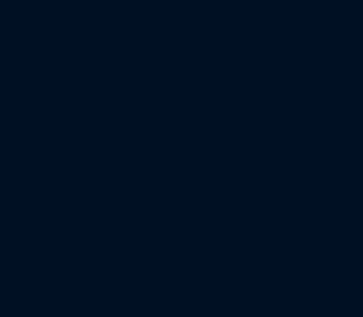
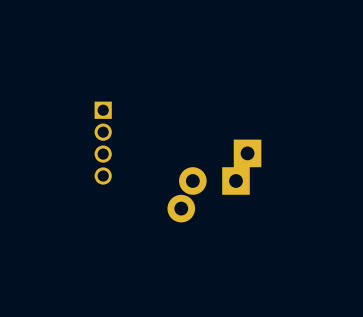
part: none -> (103, 143)
part: none -> (214, 180)

